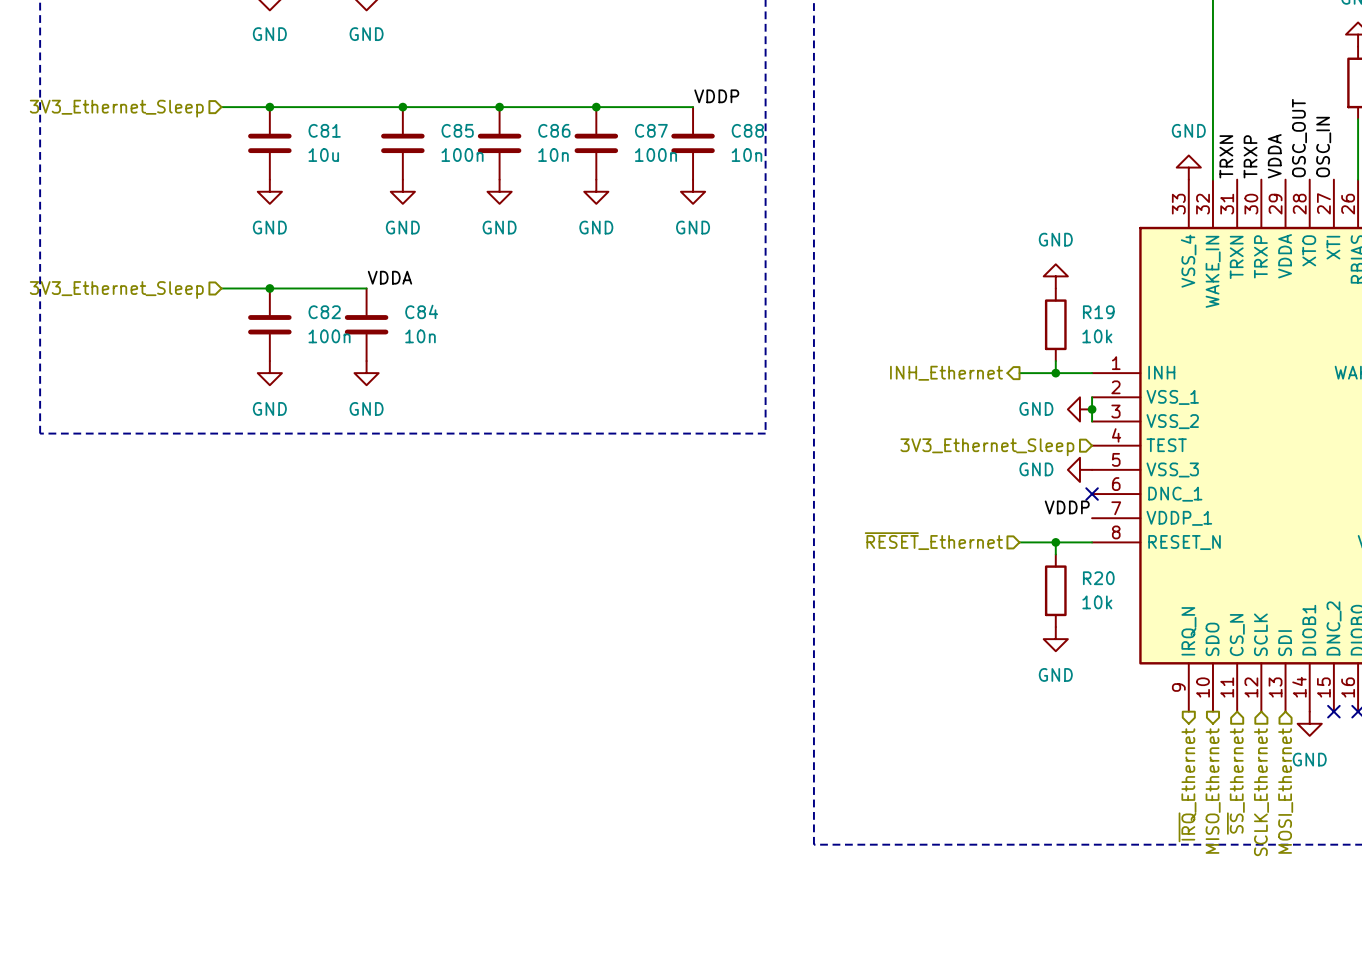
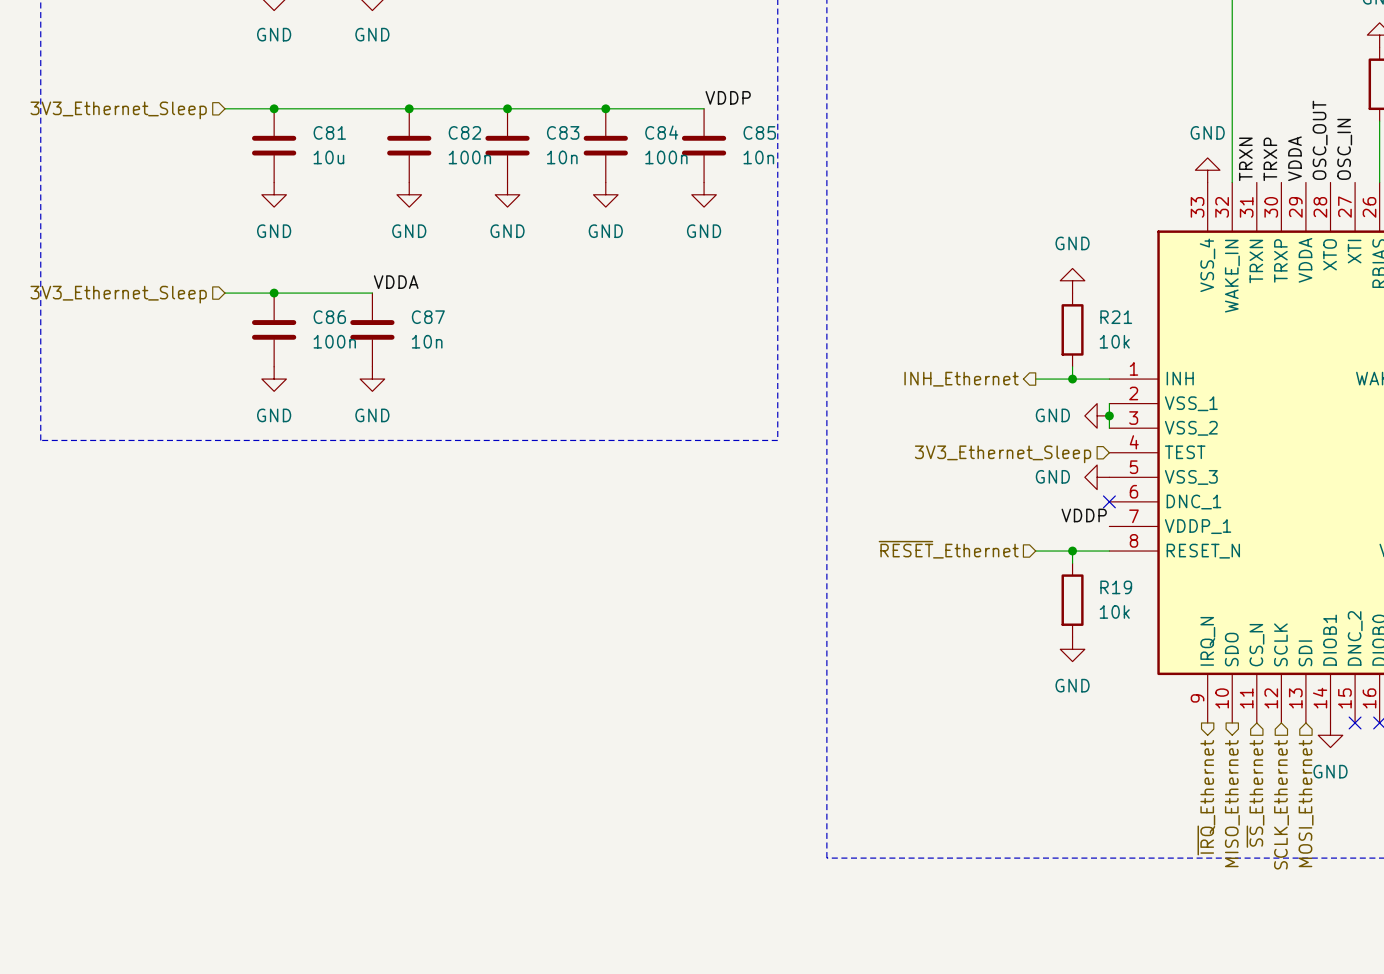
C85 name: C85 (457, 130) -> C82 (464, 132)
C86 name: C86 (554, 130) -> C83 (563, 132)
C87 name: C87 (651, 130) -> C84 (661, 132)
C88 name: C88 (747, 130) -> C85 (759, 132)
C84 name: C84 (421, 311) -> C87 (428, 317)
C82 name: C82 (324, 312) -> C86 (329, 317)
R19 name: R19 (1098, 312) -> R21 (1116, 317)
R20 name: R20 (1098, 578) -> R19 (1116, 587)

